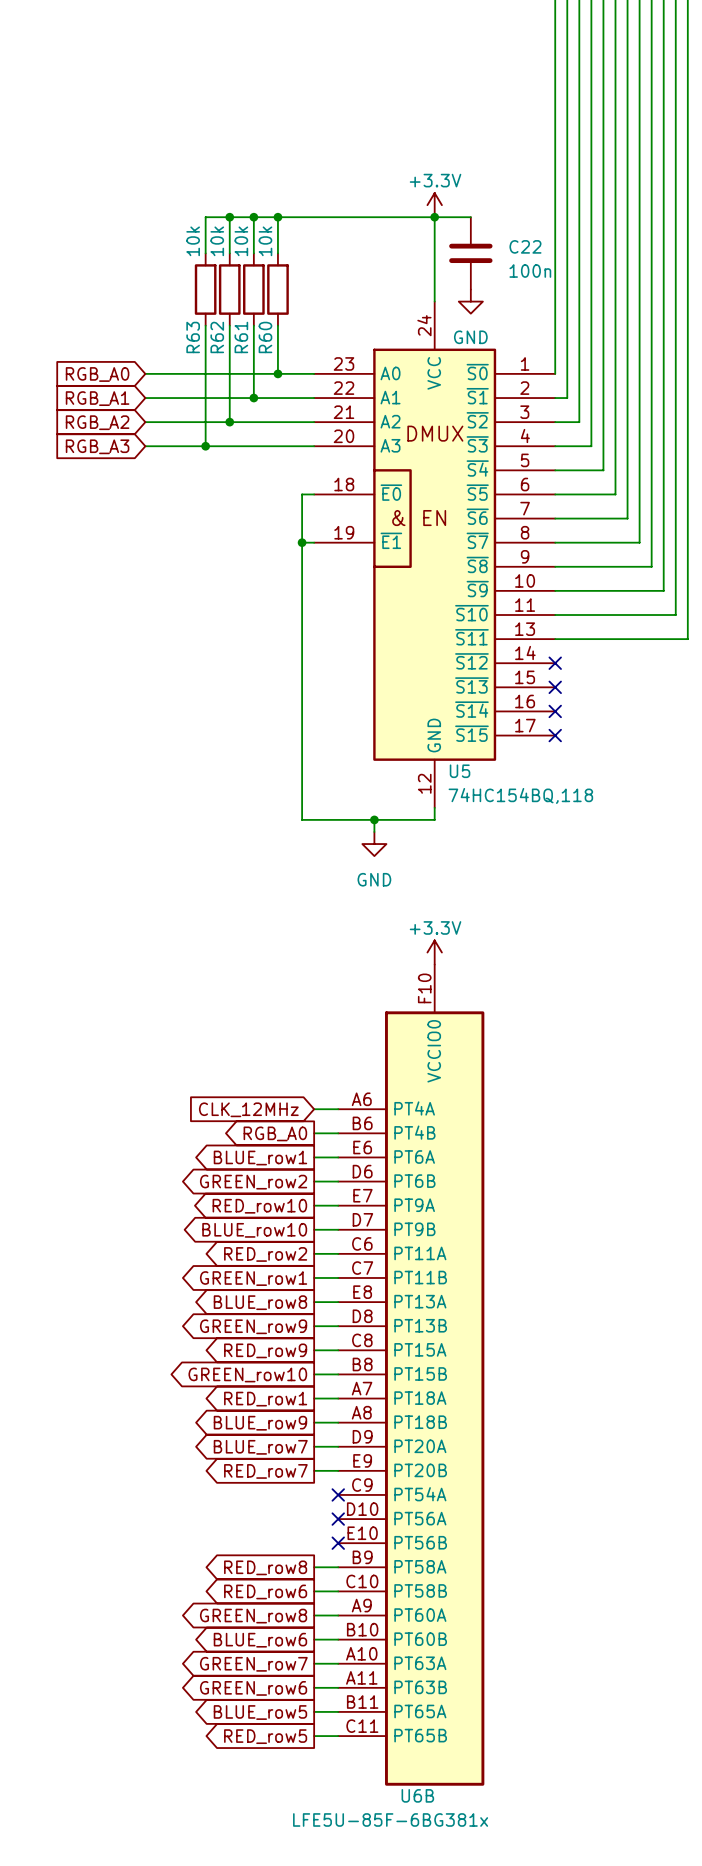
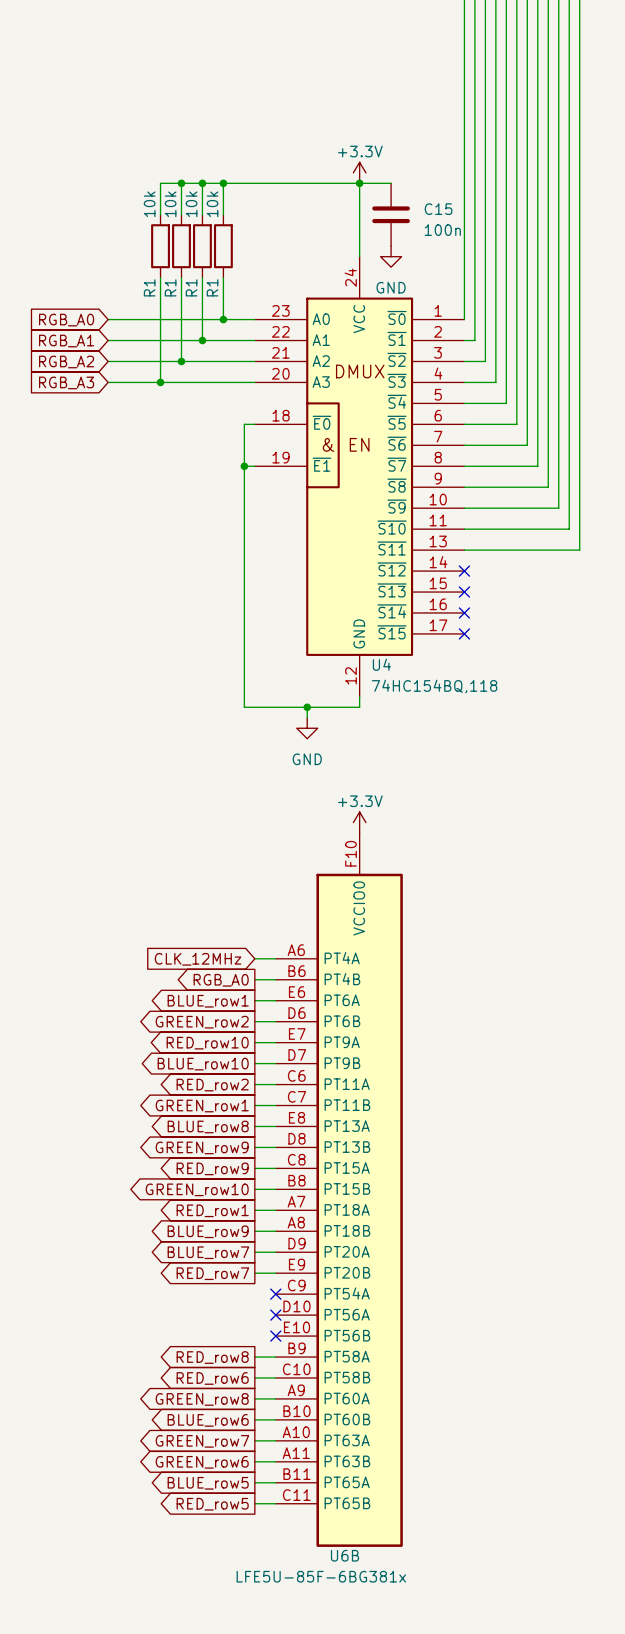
C22 name: C22 (525, 246) -> C15 (438, 209)
R63 name: R63 (193, 337) -> R1 (149, 287)
R62 name: R62 (217, 337) -> R1 (170, 287)
R61 name: R61 (241, 337) -> R1 (191, 287)
R60 name: R60 (265, 337) -> R1 (212, 287)
U5 name: U5 (460, 771) -> U4 (381, 664)

